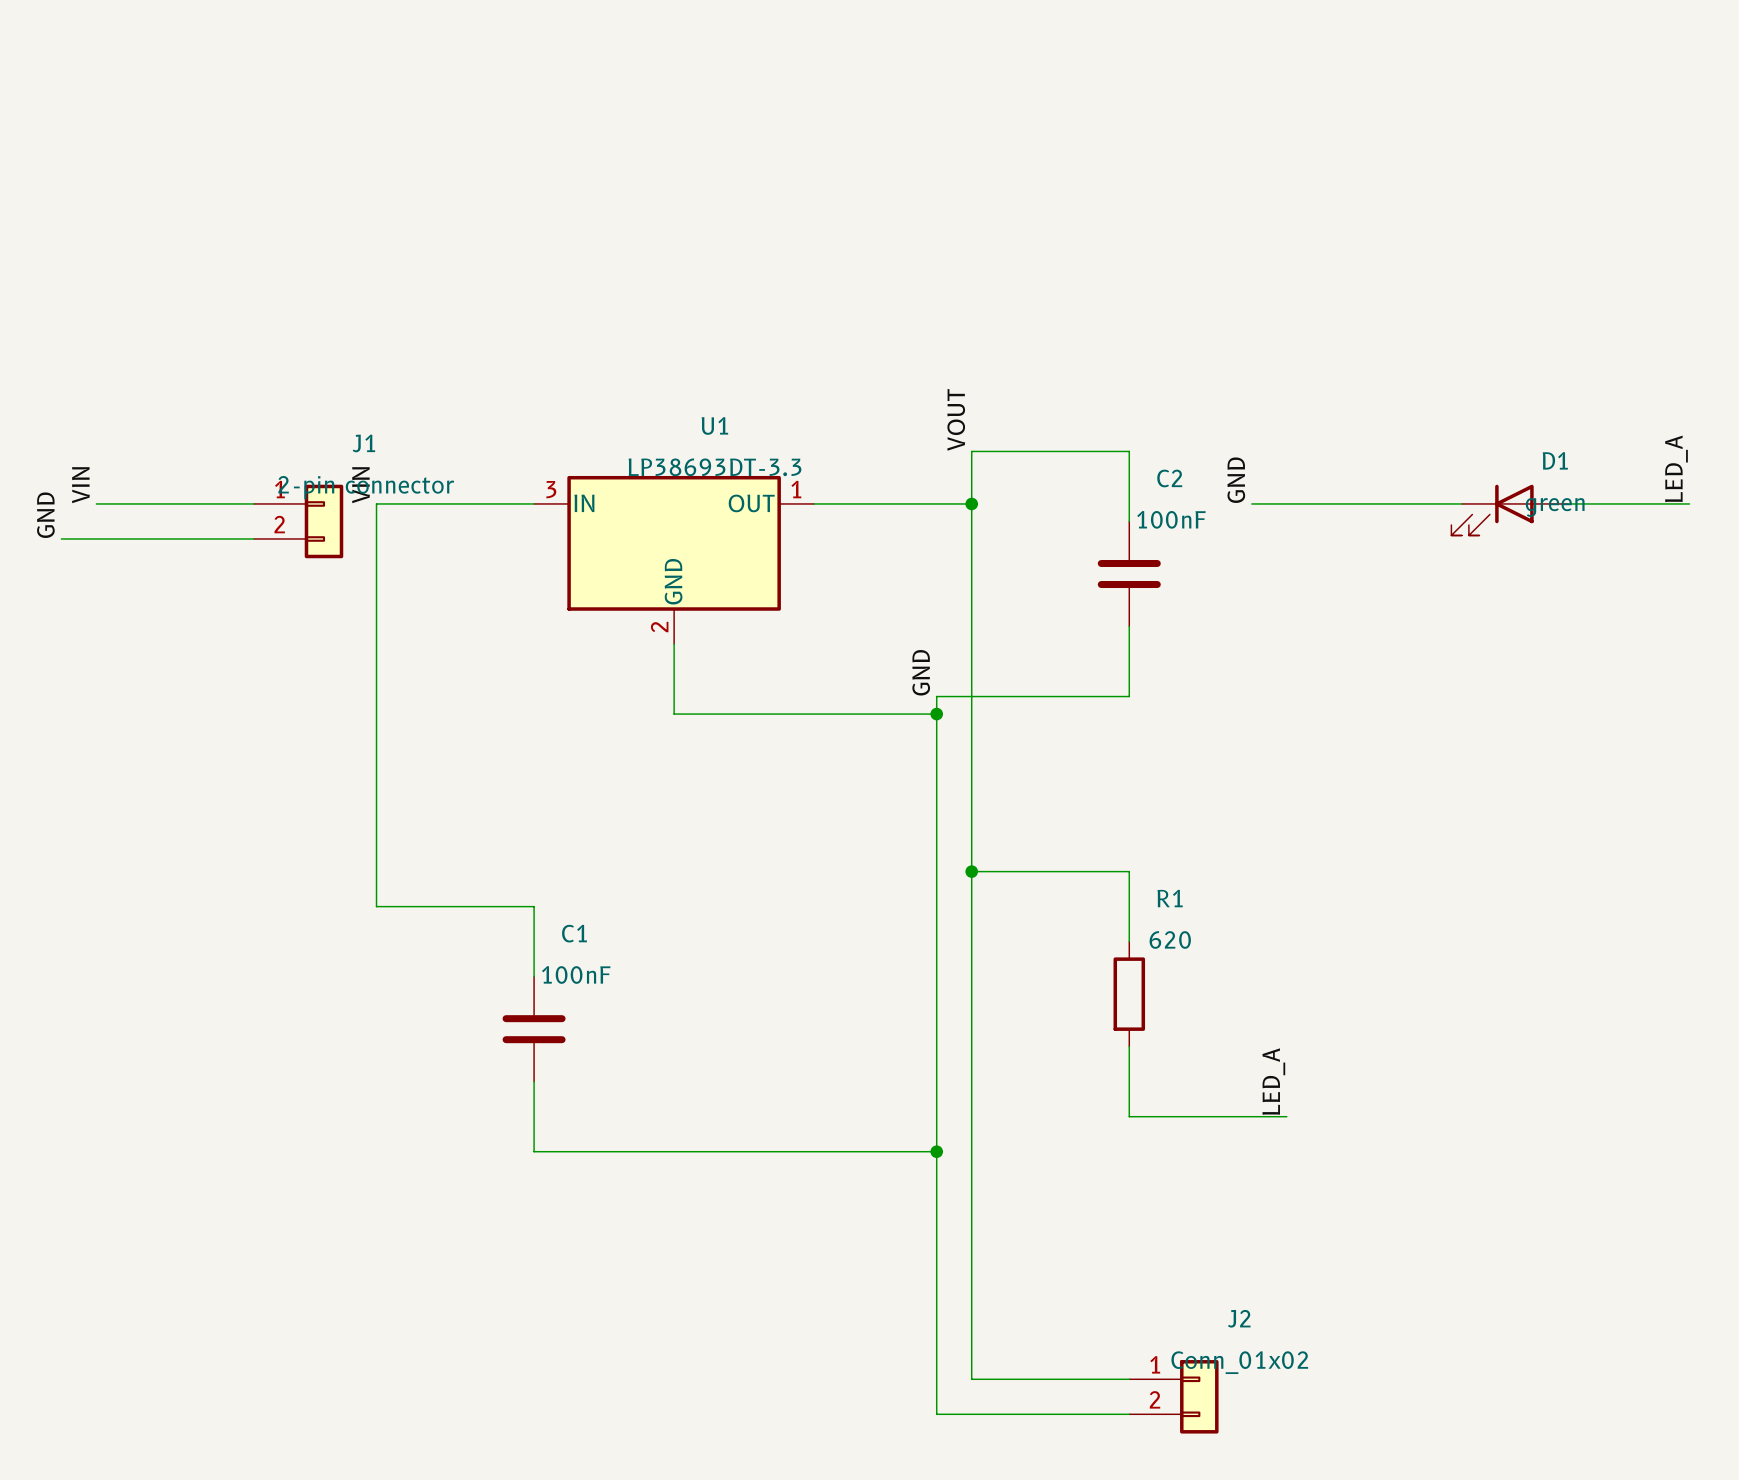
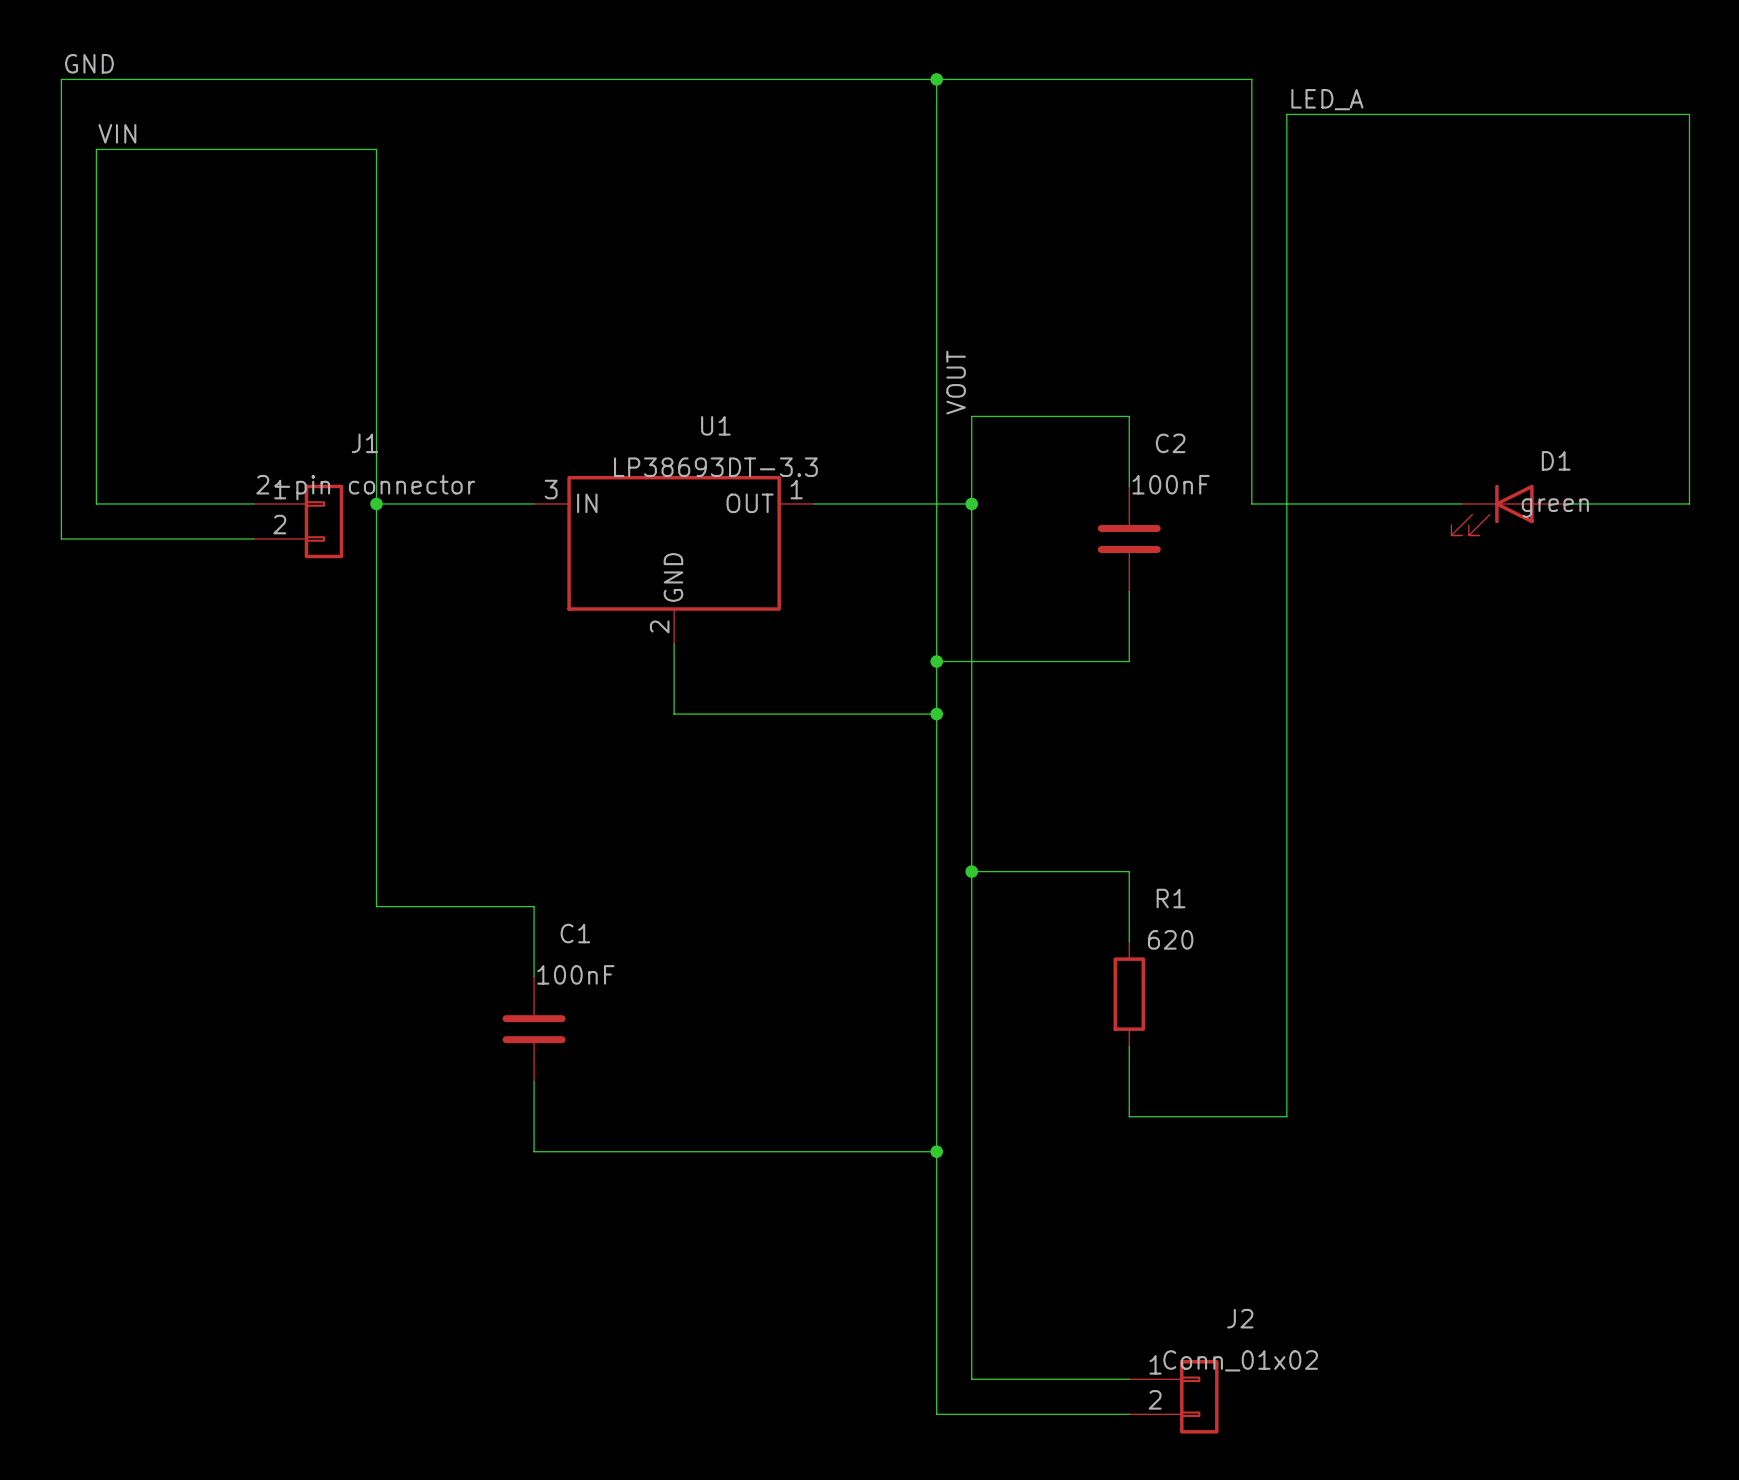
label: none -> GND (89, 63)
wire: none -> (936, 79) (936, 696)
junction: none -> (936, 79)
label: none -> LED_A (1327, 99)
label: none -> VIN (117, 133)
label position: VOUT (956, 419) -> VOUT (956, 382)
wire: (971, 451) (1129, 451) -> (971, 451) (971, 416) (1129, 416) (1129, 451)
label: LED_A (1676, 468) -> none
label: GND (1236, 480) -> none
label: VIN (80, 485) -> none
label: VIN (361, 485) -> none
wire: none -> (96, 503) (96, 149) (376, 149) (376, 503)
junction: none -> (376, 503)
wire: none -> (1251, 503) (1251, 79) (61, 79) (61, 538)
wire: none -> (1689, 503) (1689, 114) (1286, 114) (1286, 1116)
label: GND (45, 515) -> none
C2 position: (1129, 574) -> (1129, 538)
junction: none -> (936, 661)
wire: (1129, 661) (1129, 696) (936, 696) -> (1129, 661) (936, 661)
label: GND (921, 672) -> none
label: LED_A (1273, 1081) -> none

